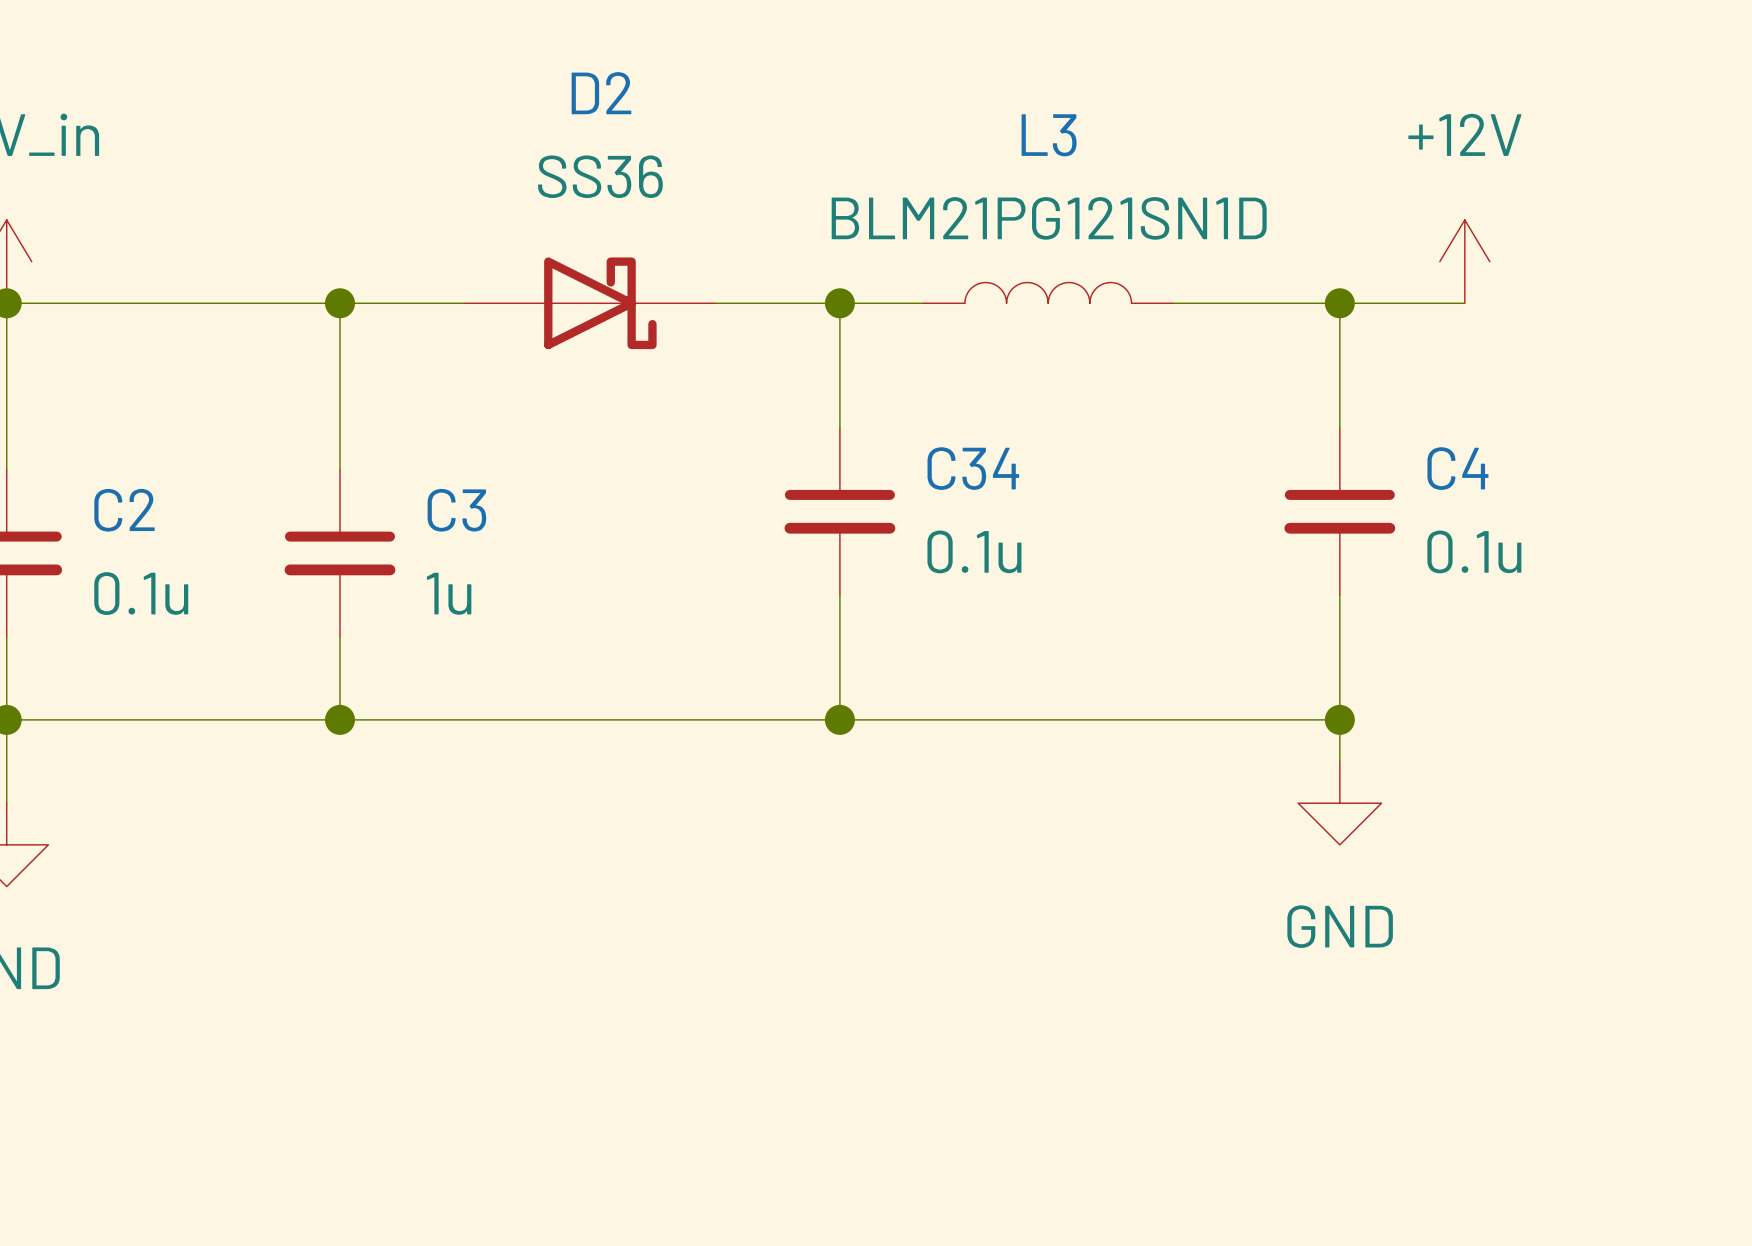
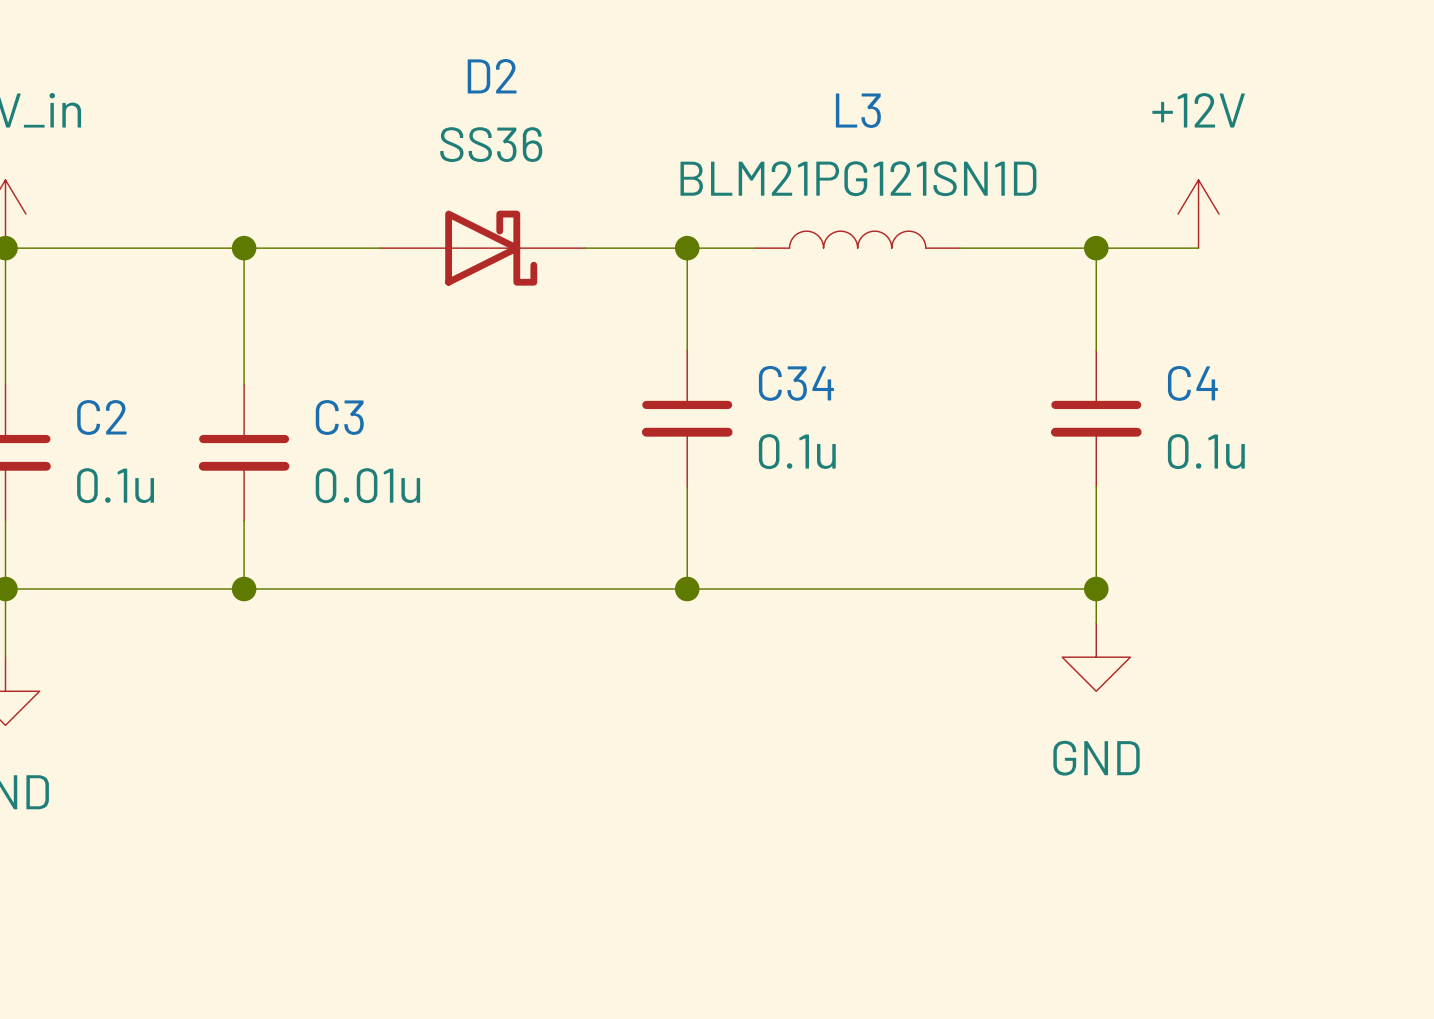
wire: (340, 303) (340, 469) -> (244, 248) (244, 384)
junction position: (340, 303) -> (244, 248)
C3 position: (340, 553) -> (244, 452)
C3 value: 1u (449, 593) -> 0.01u (367, 485)
wire: (340, 636) (340, 719) -> (244, 520) (244, 589)
junction position: (340, 719) -> (244, 589)

